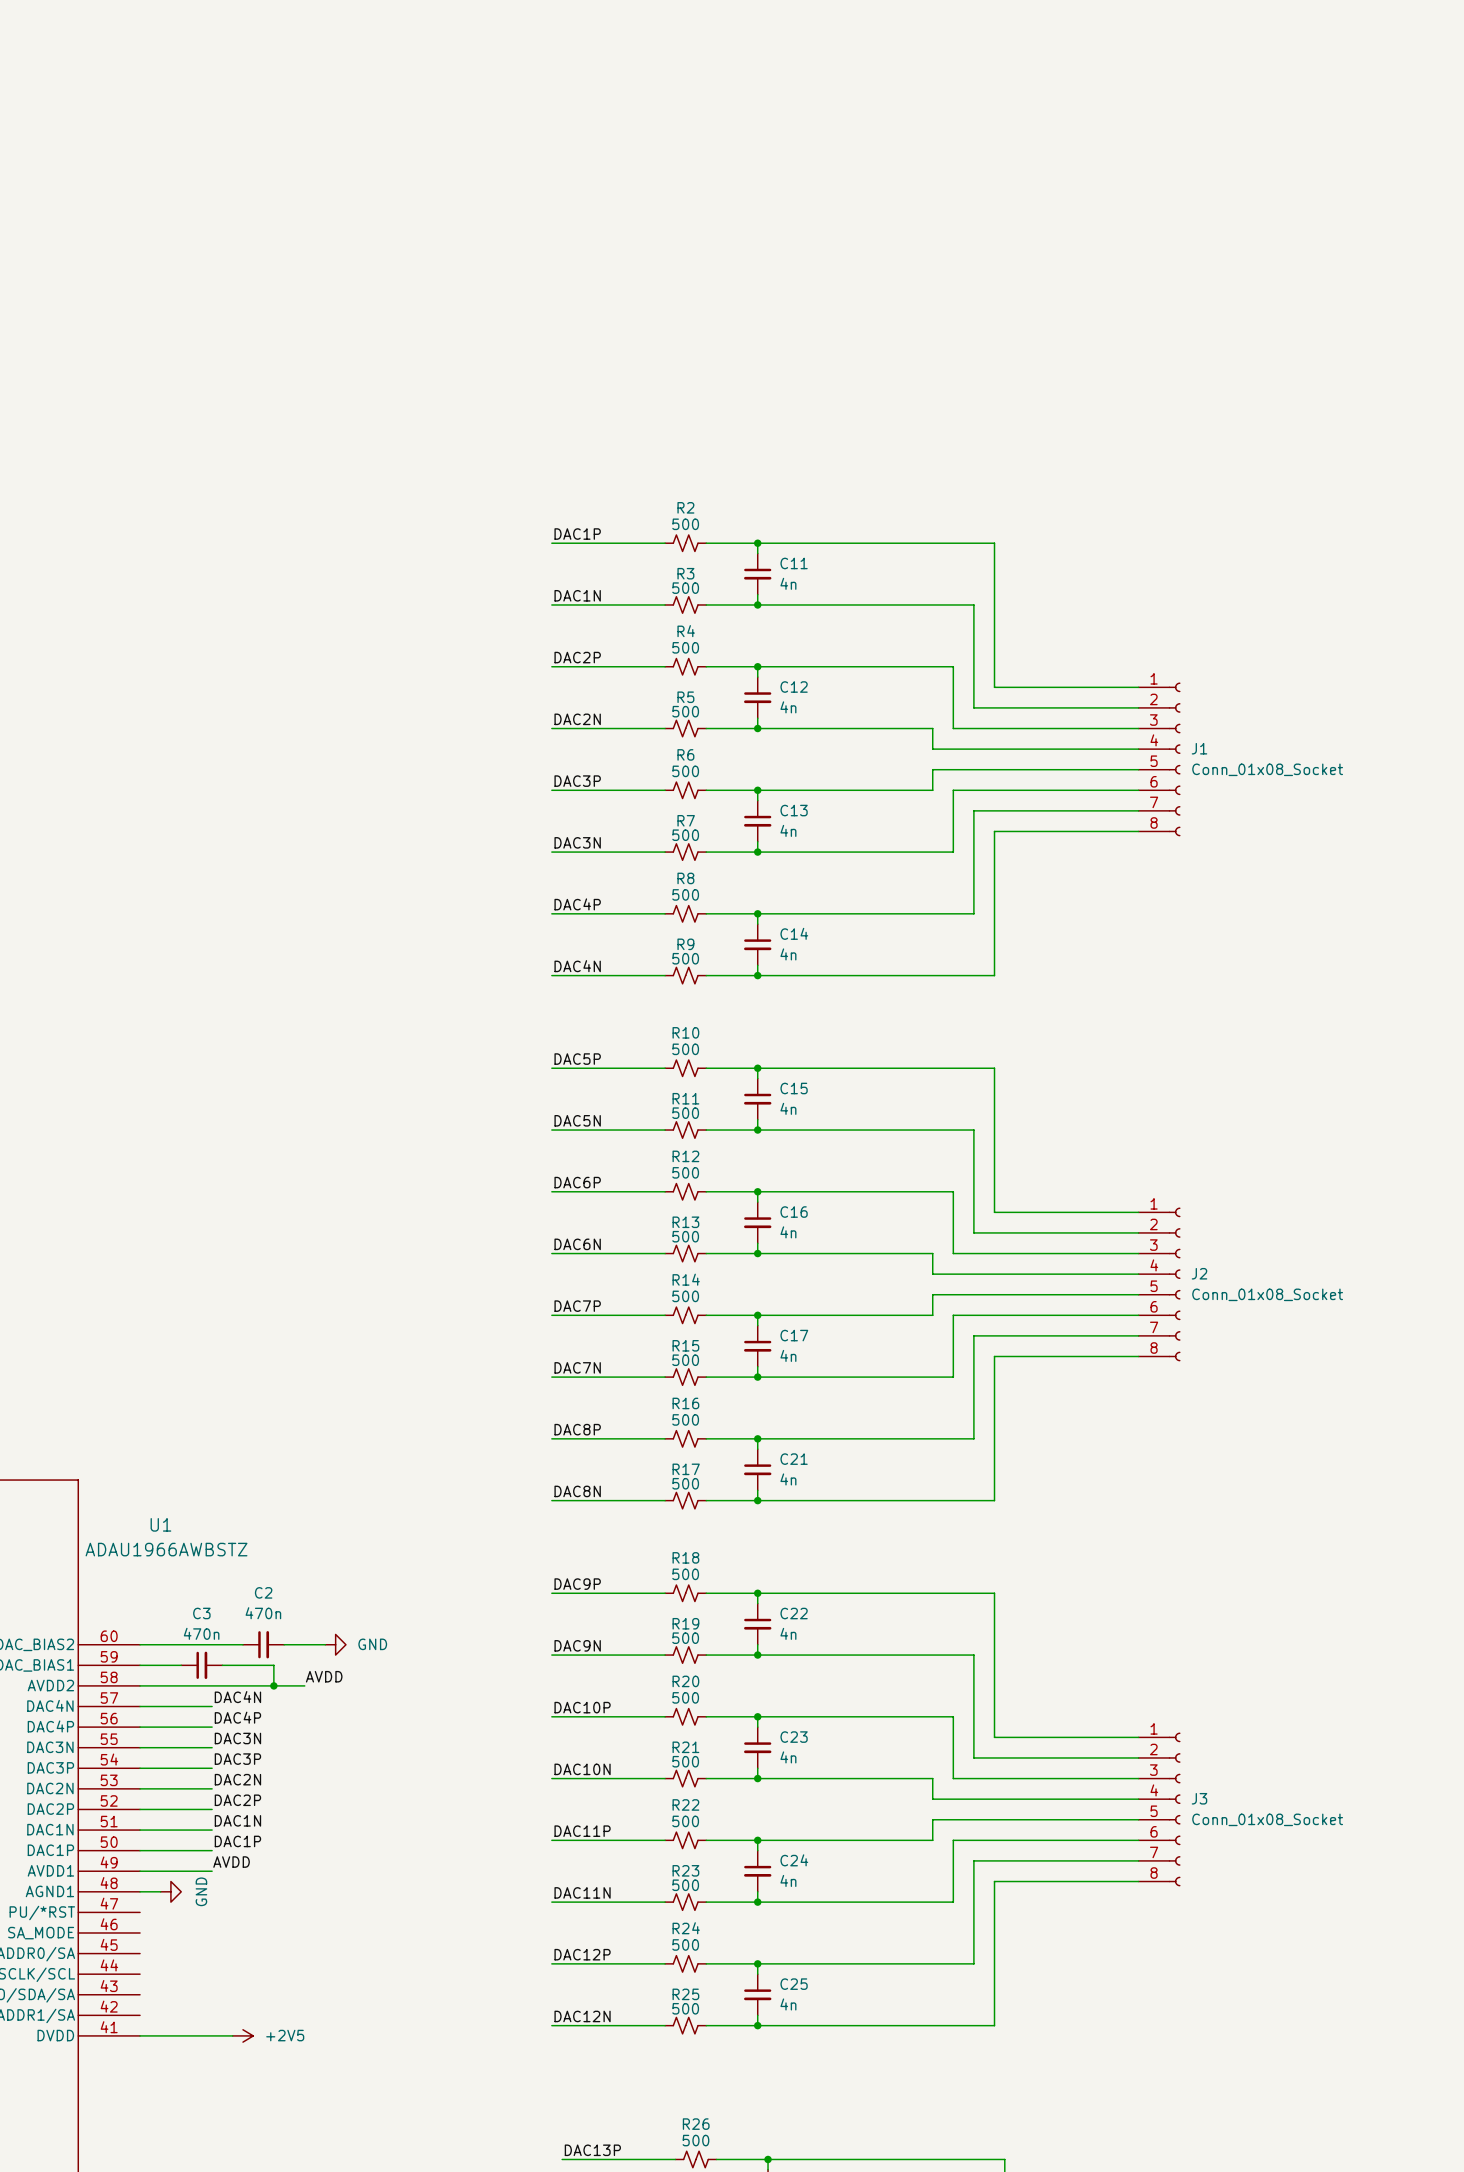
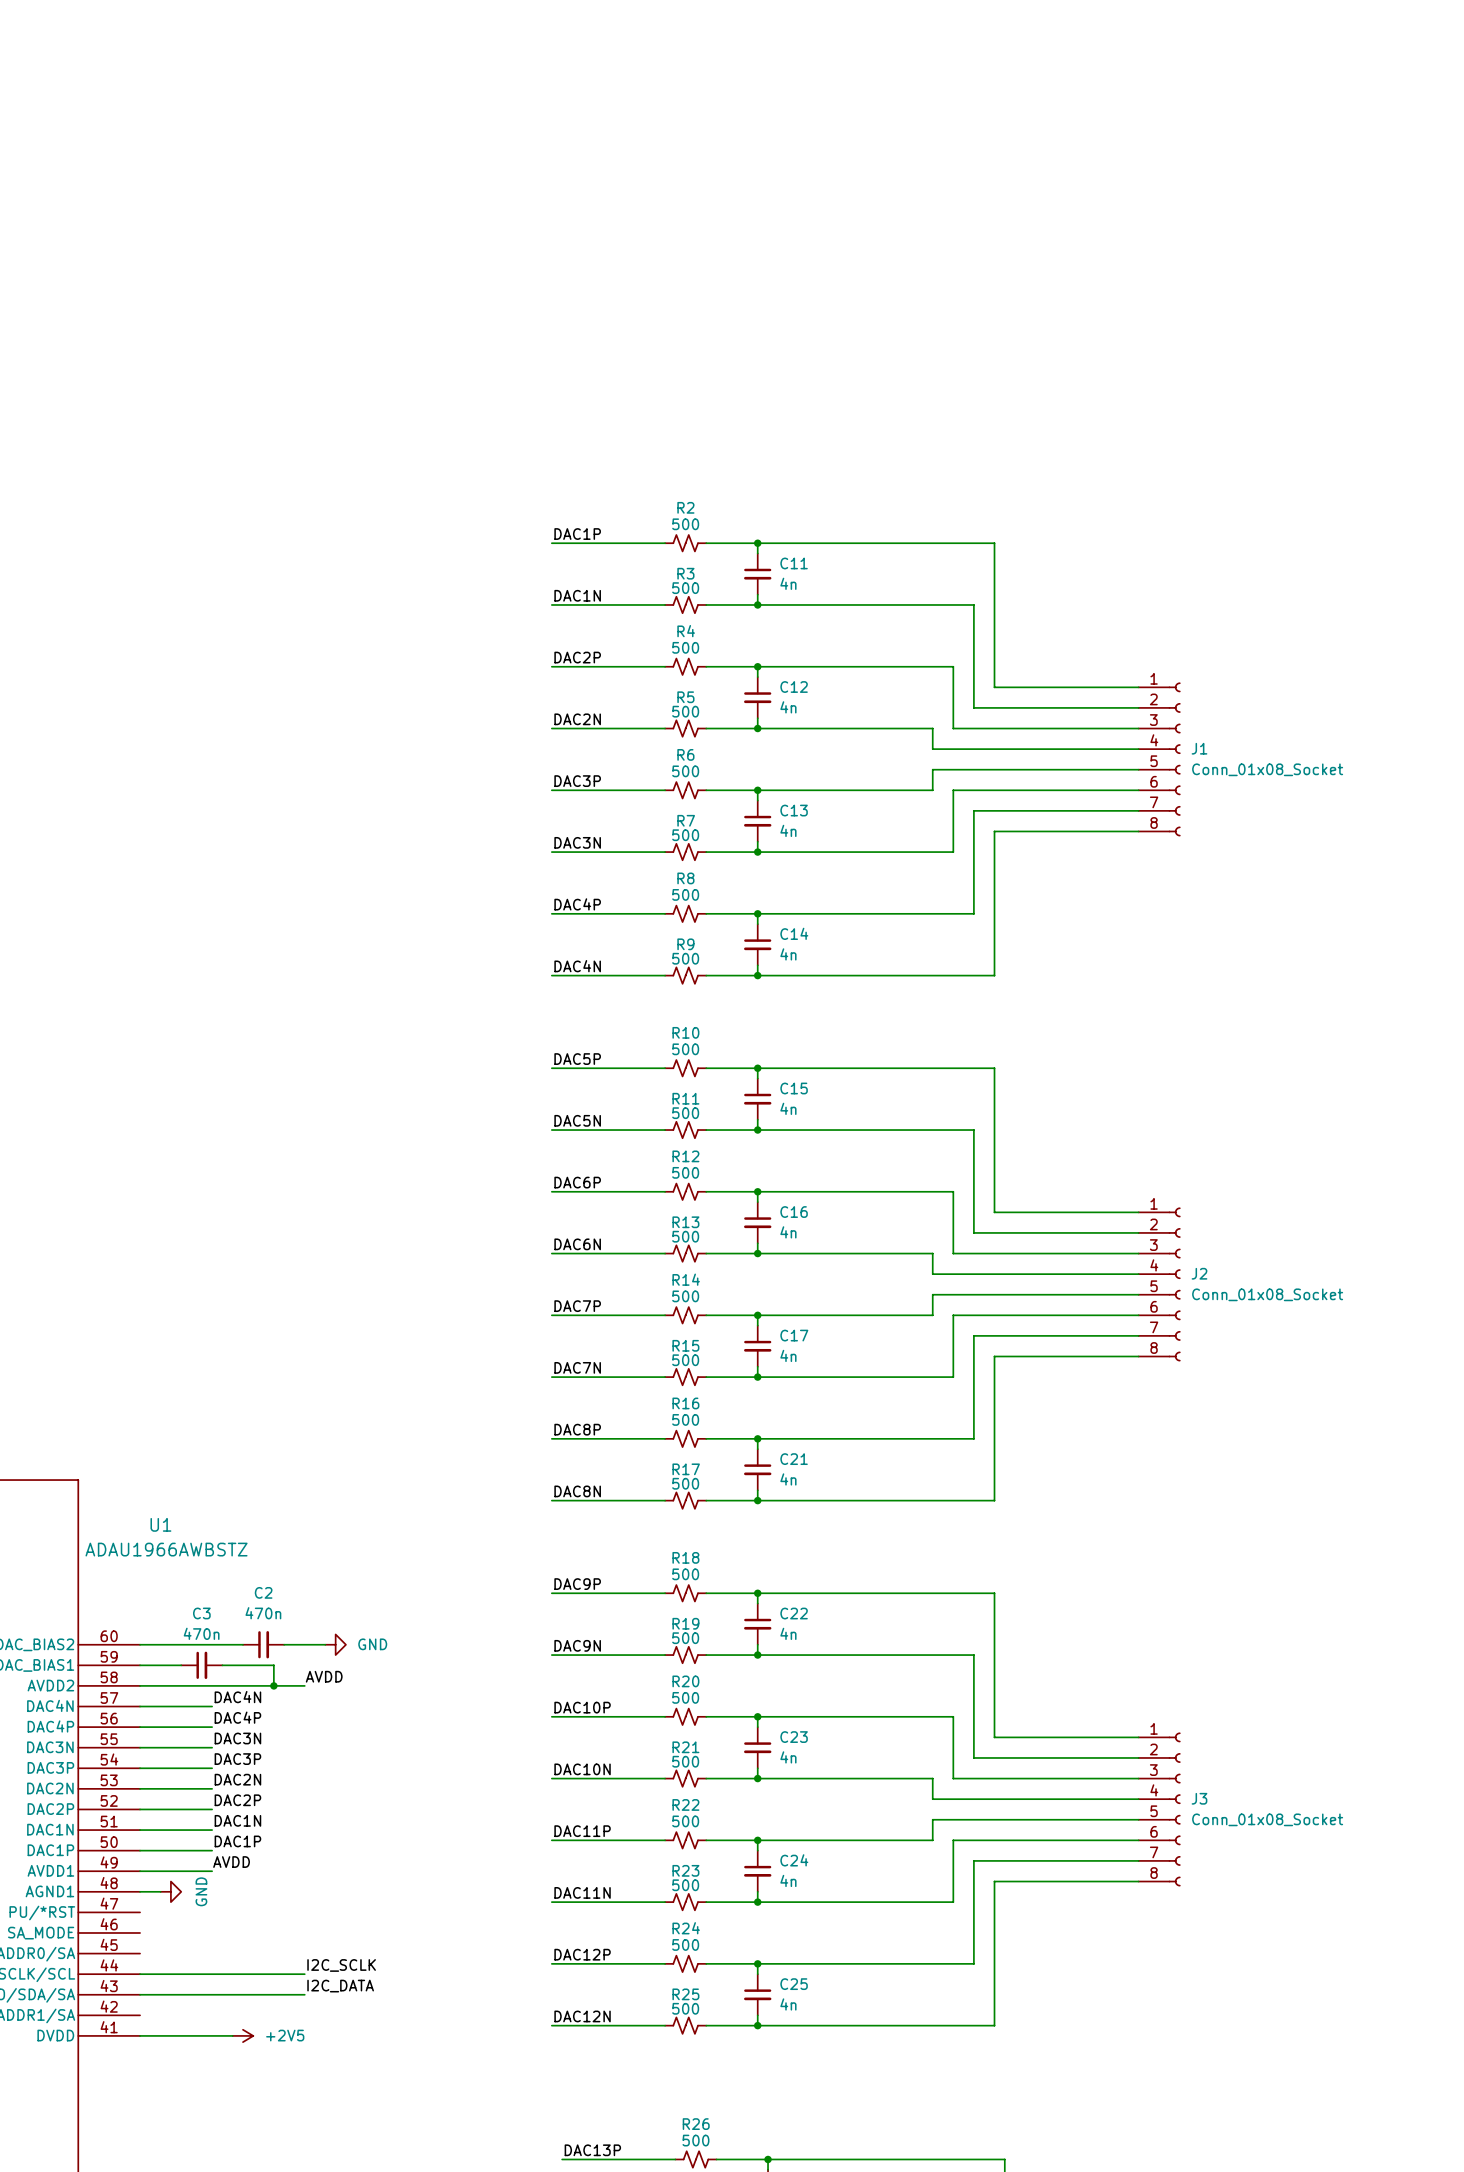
label: none -> I2C_SCLK (341, 1965)
wire: none -> (140, 1974) (304, 1974)
label: none -> I2C_DATA (340, 1986)
wire: none -> (140, 1994) (304, 1994)

